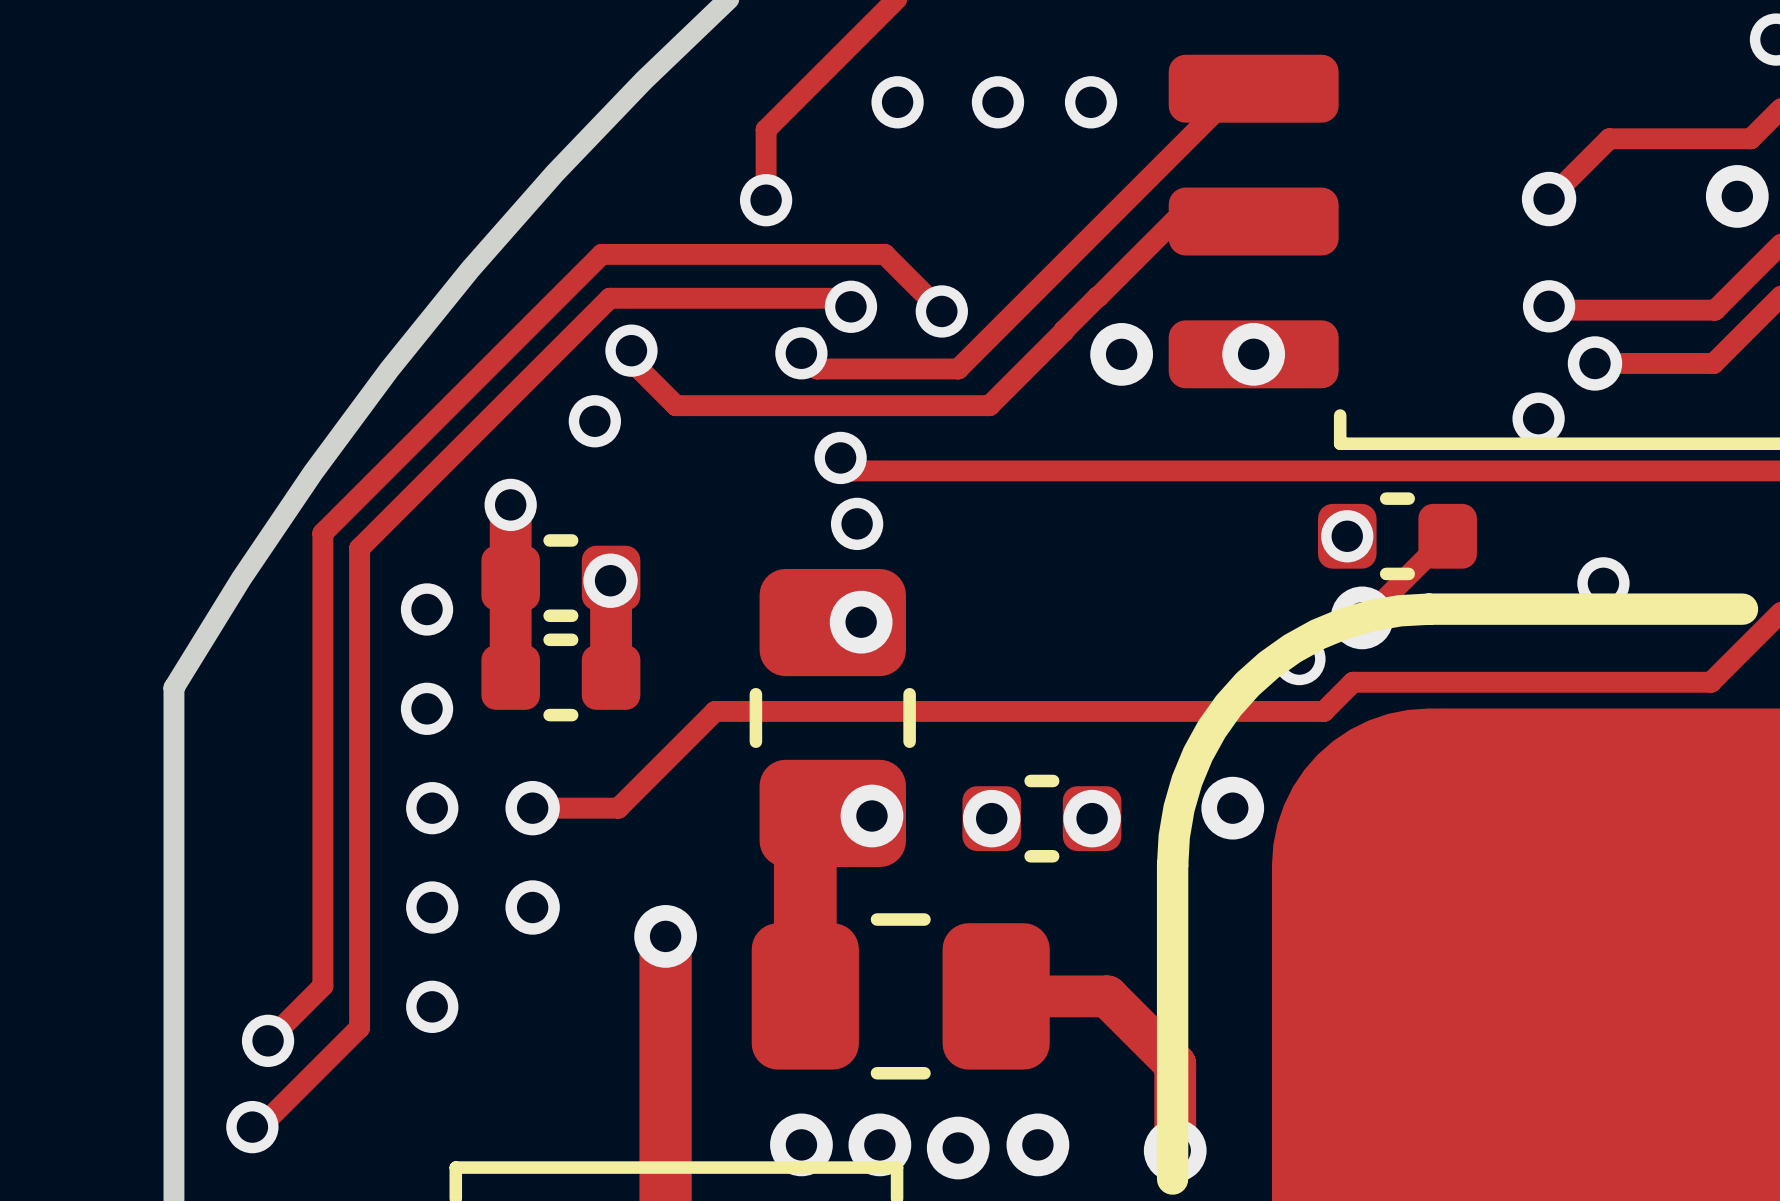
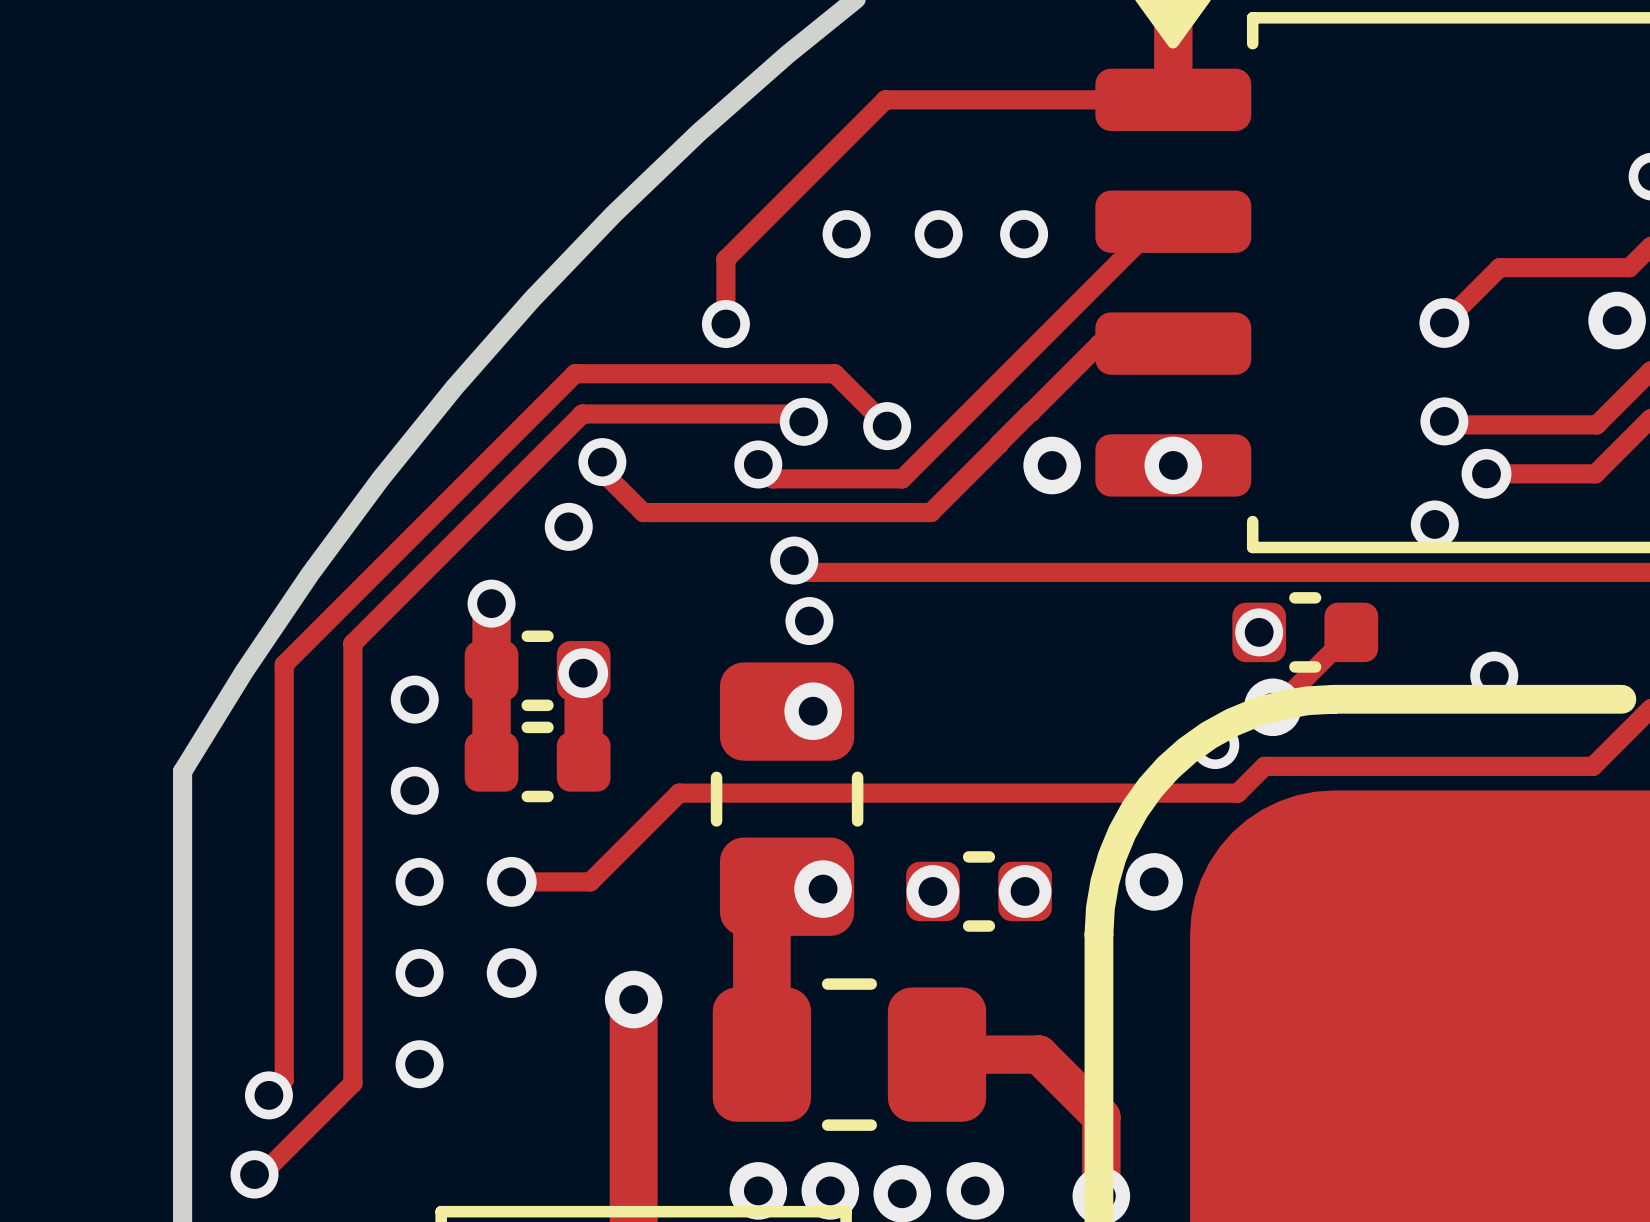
track: (322, 533) (322, 986) (284, 1024) -> (319, 629) (284, 664) (284, 1080)

